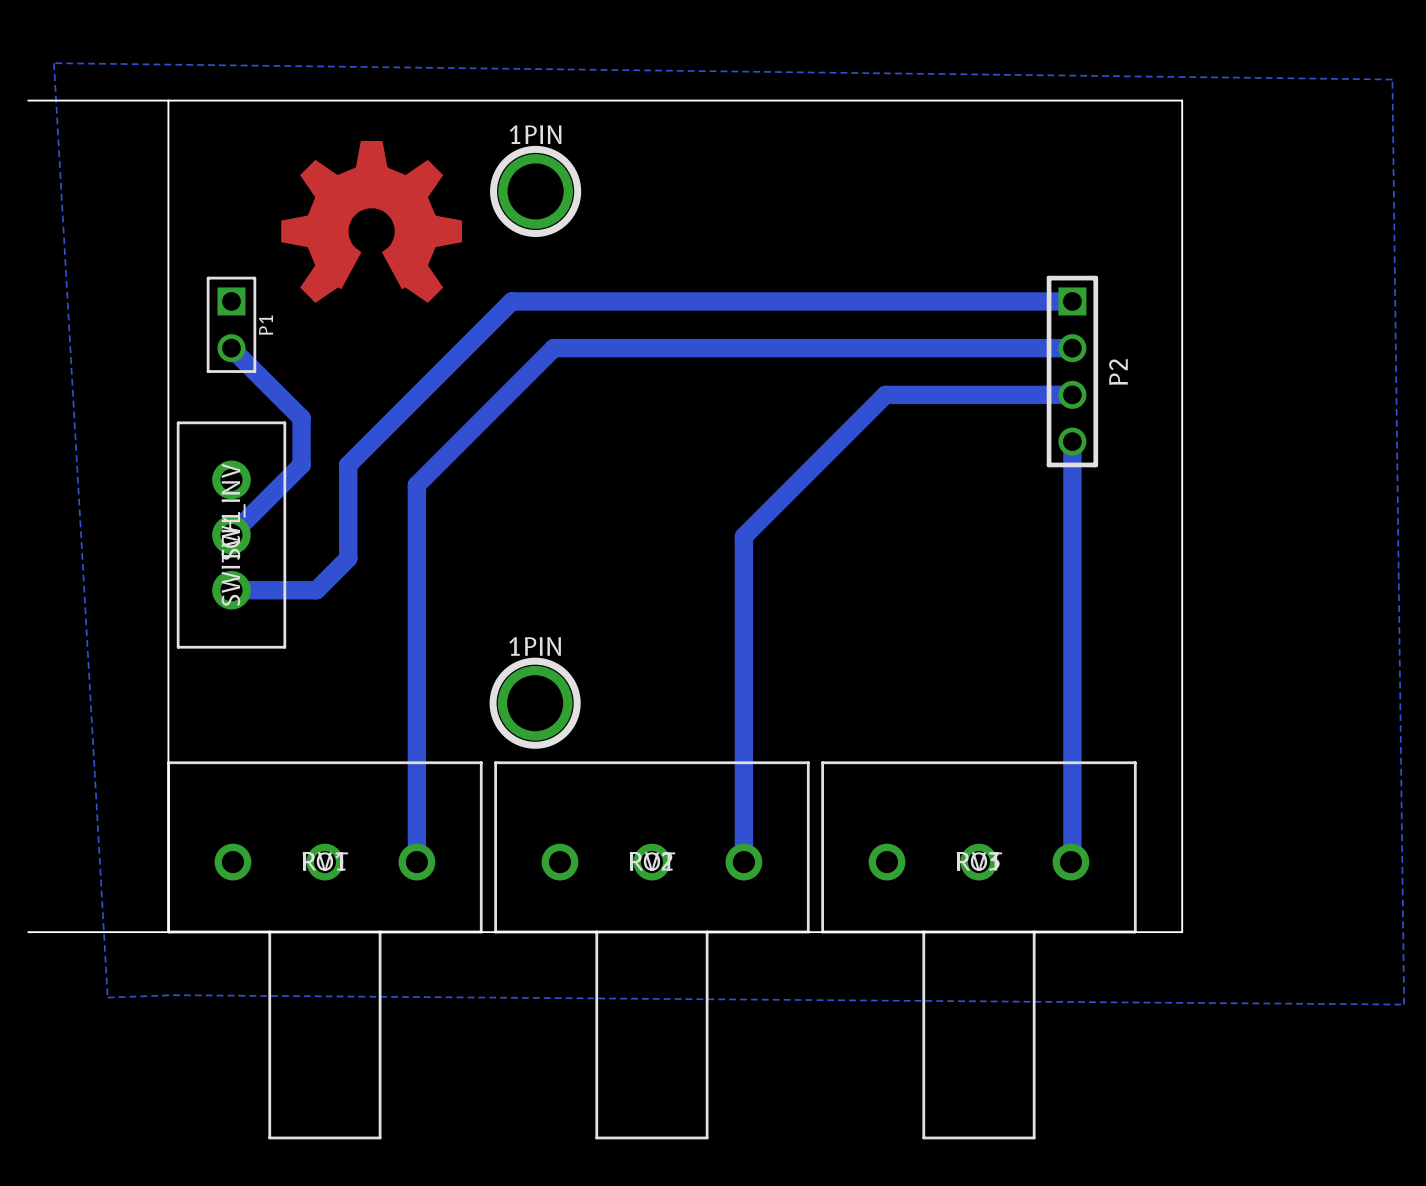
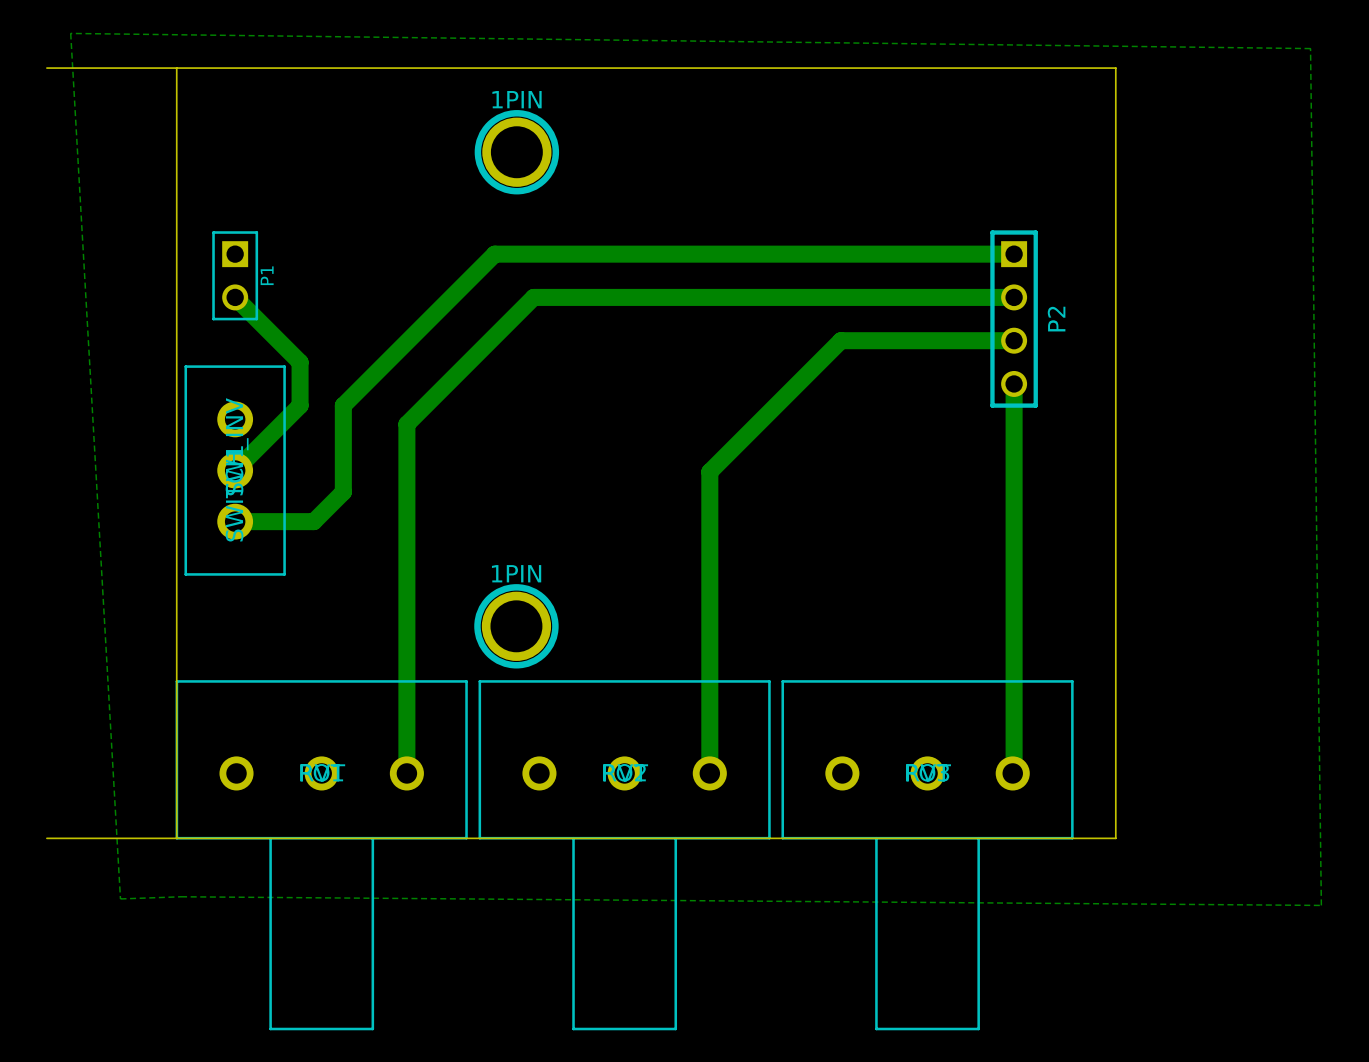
part: (371, 221) -> none

